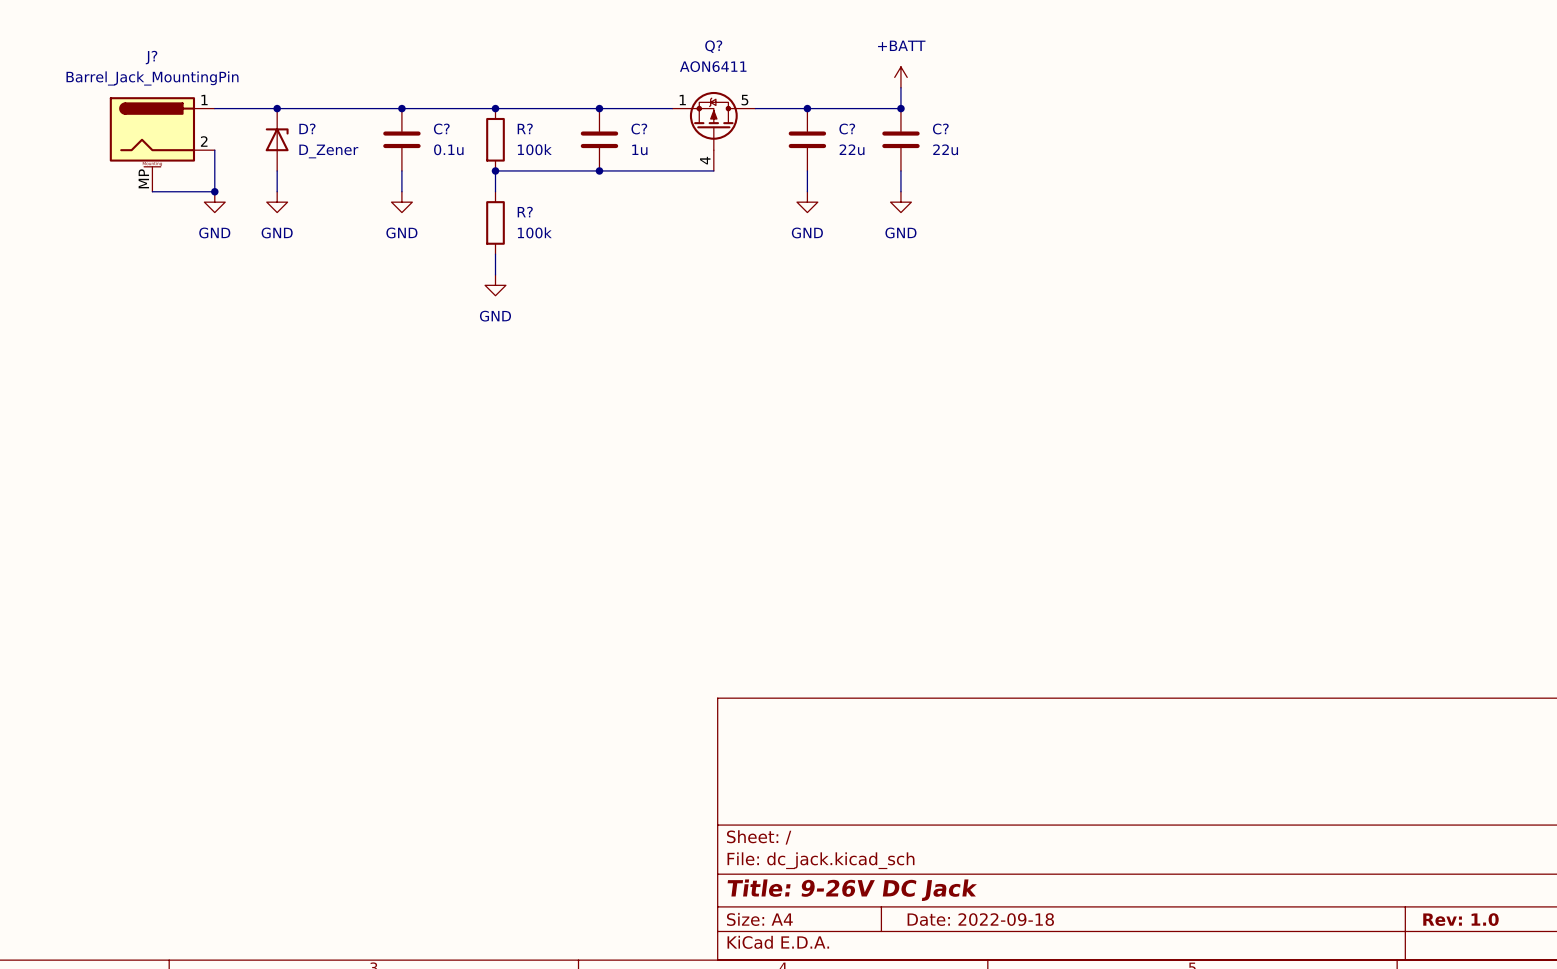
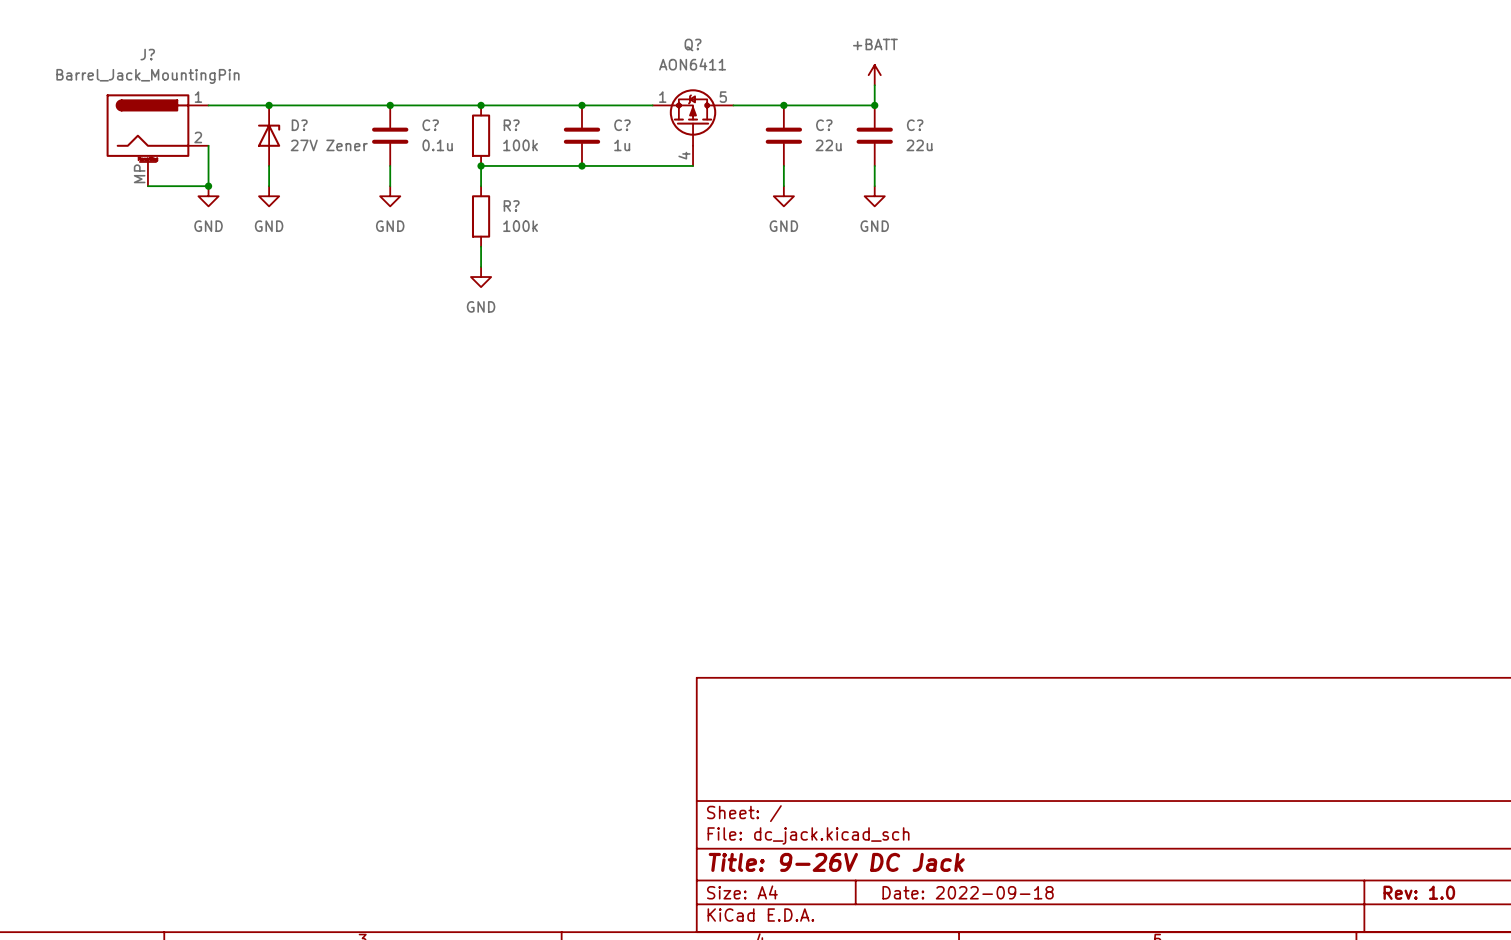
D? value: D_Zener (328, 151) -> 27V Zener (329, 145)

